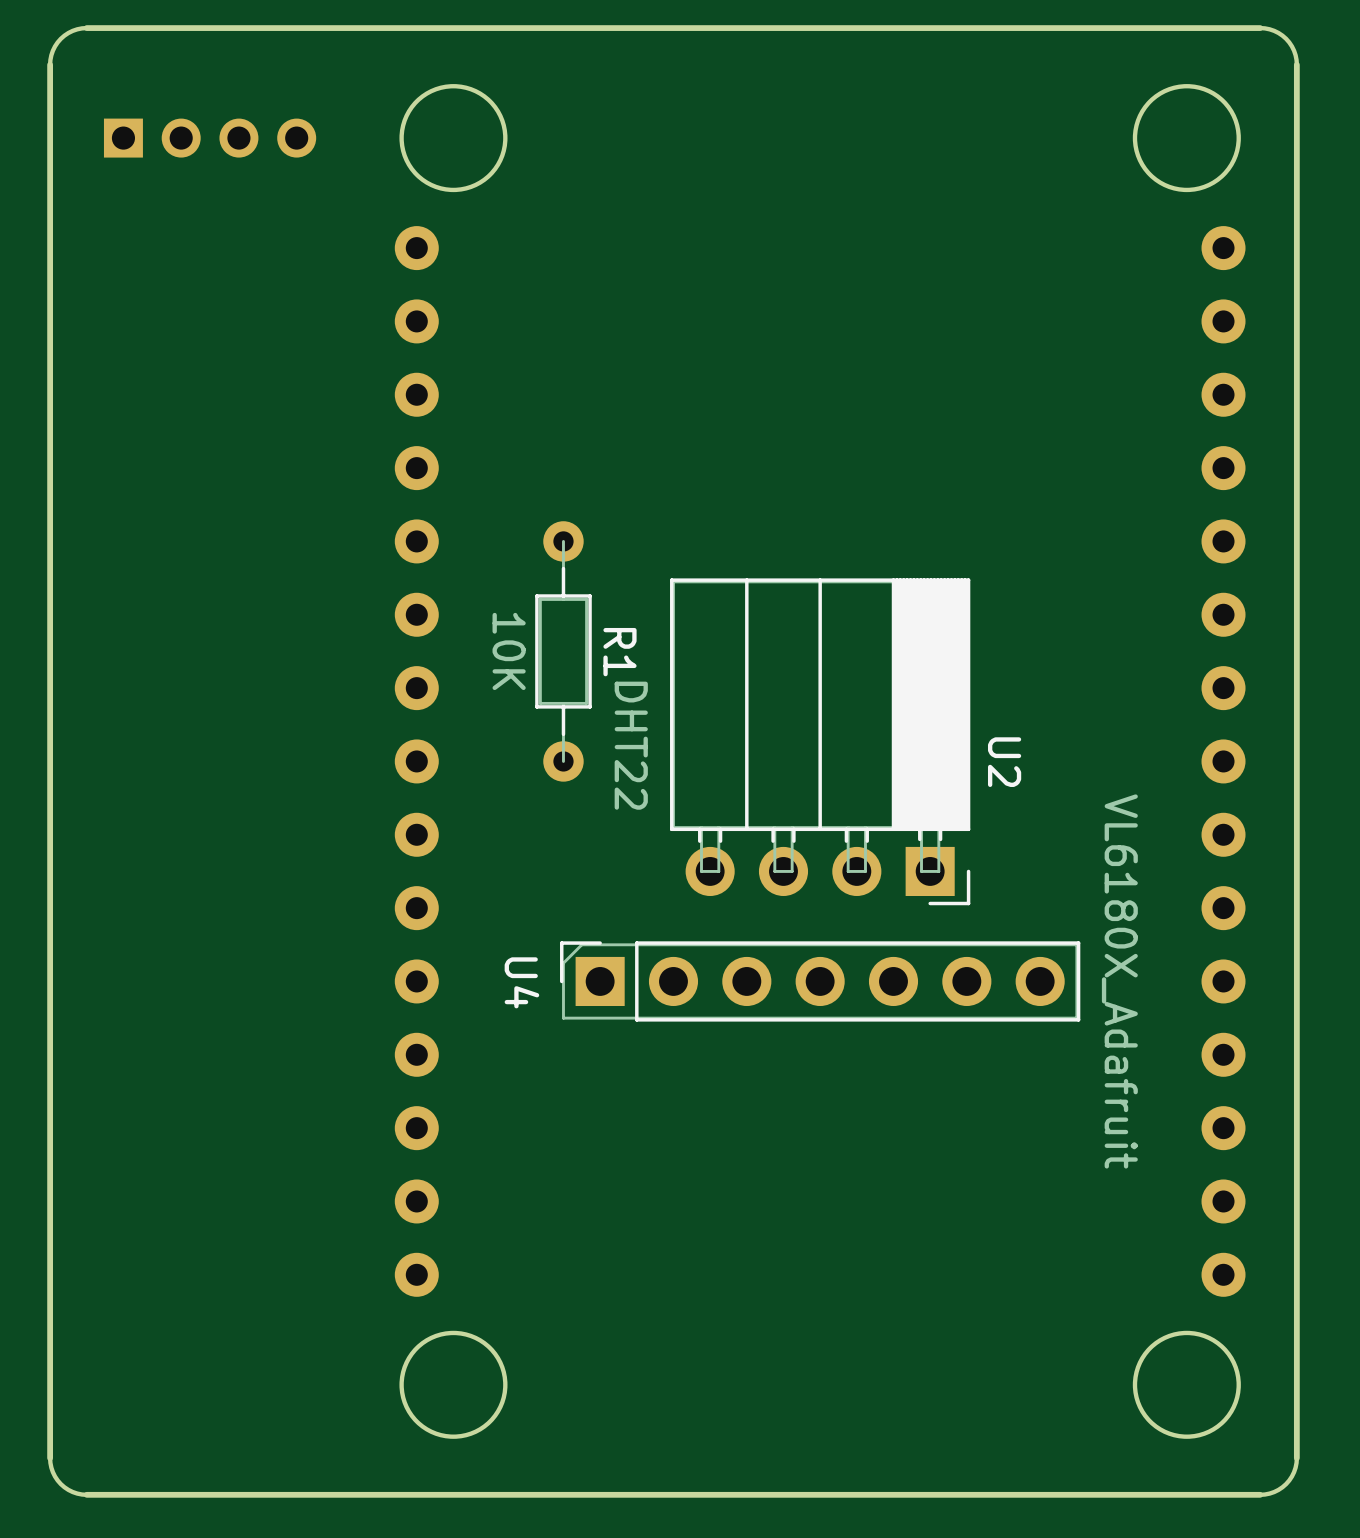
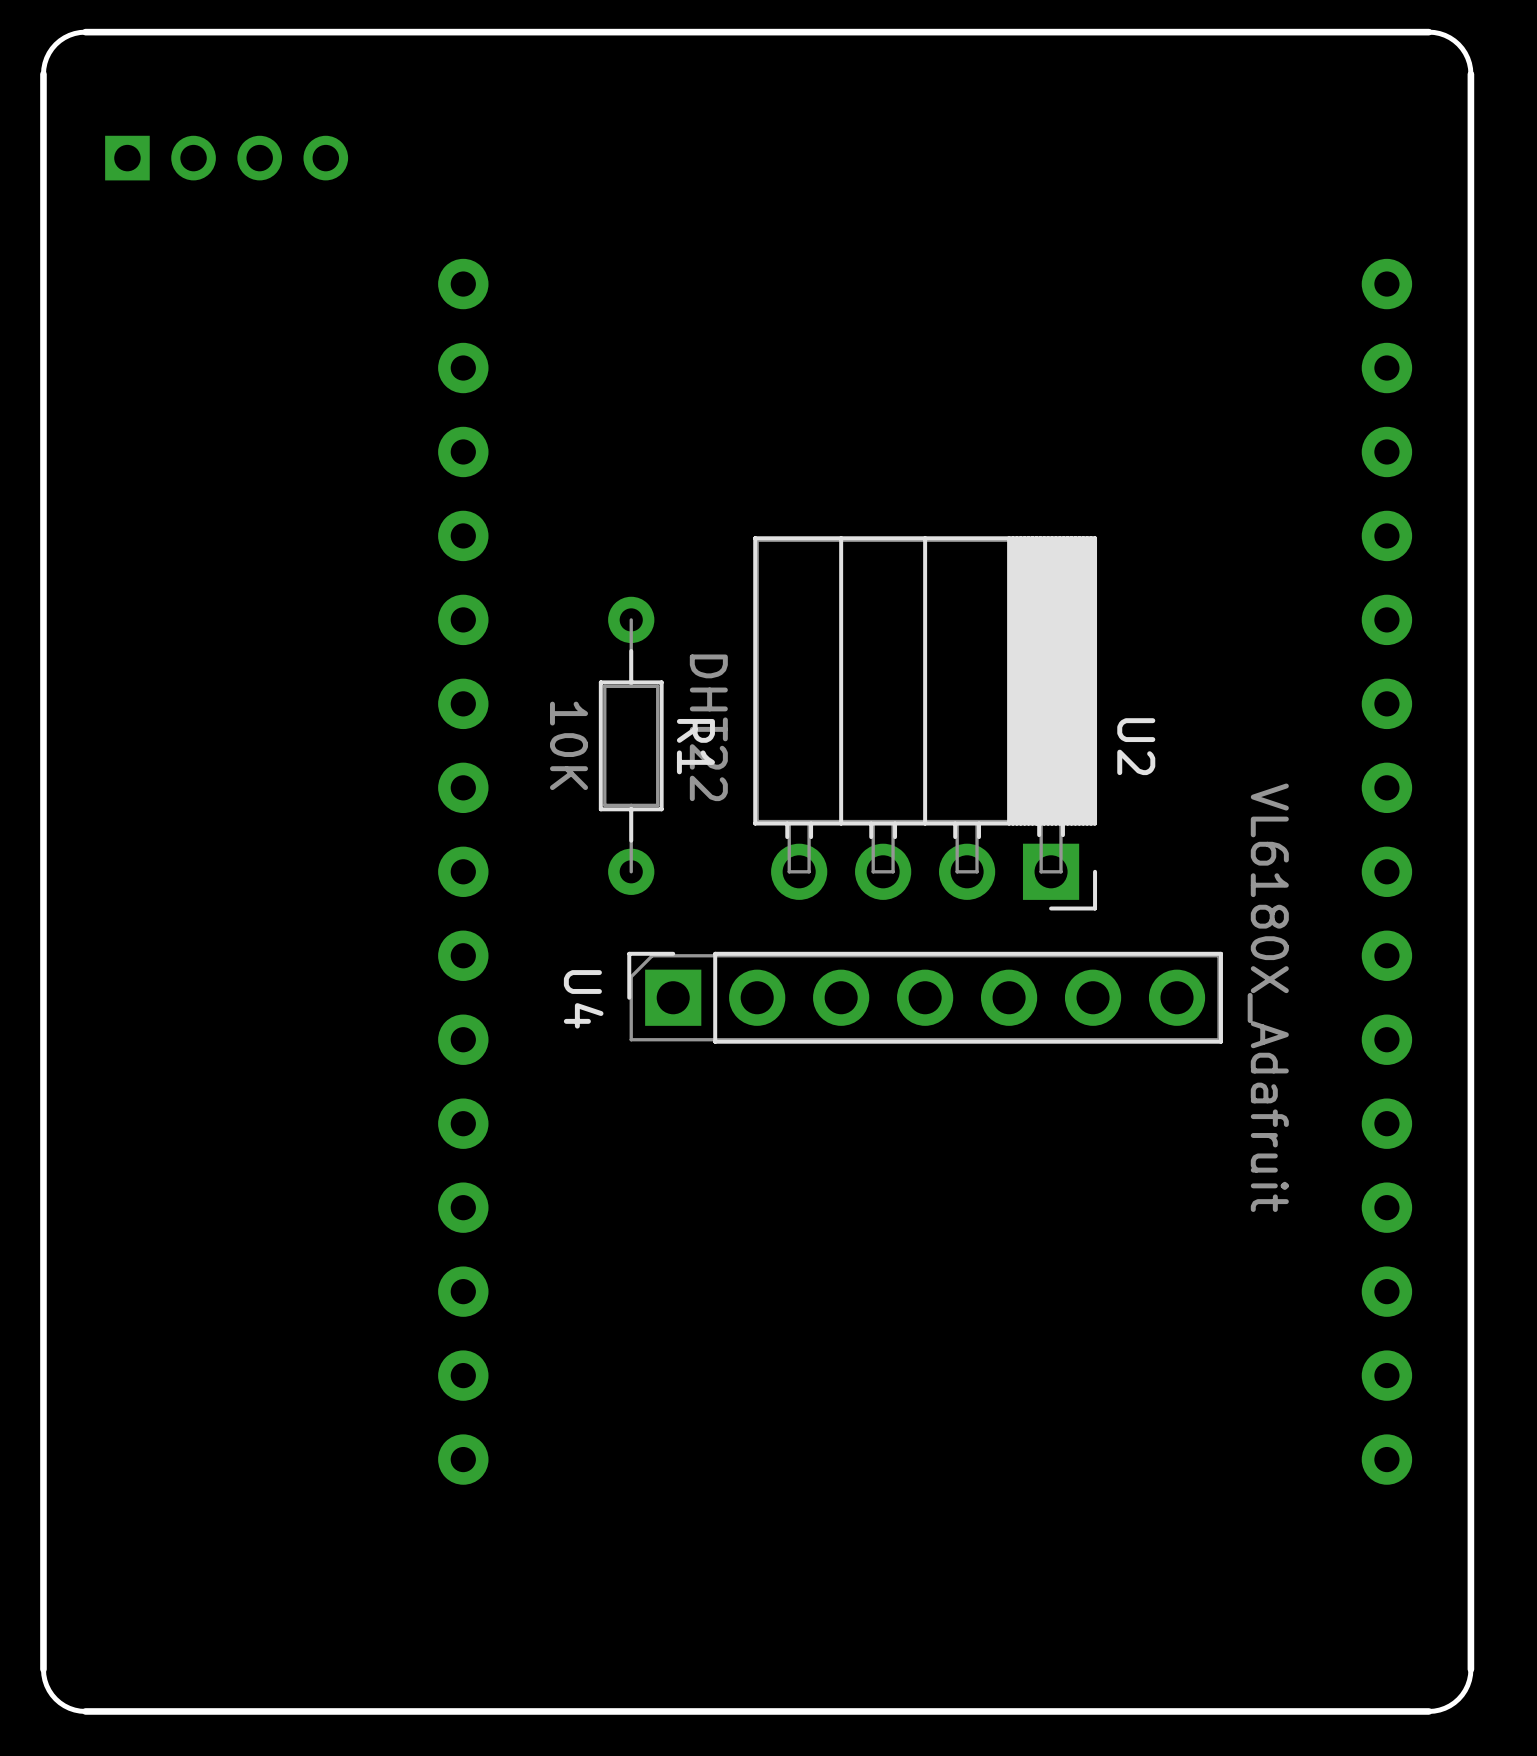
round board edge: [399, 84, 508, 193] -> none
round board edge: [1132, 84, 1241, 193] -> none
U2 position: (820, 741) -> (925, 723)
U4 position: (820, 981) -> (925, 997)
round board edge: [399, 1330, 508, 1439] -> none
round board edge: [1132, 1330, 1241, 1439] -> none

